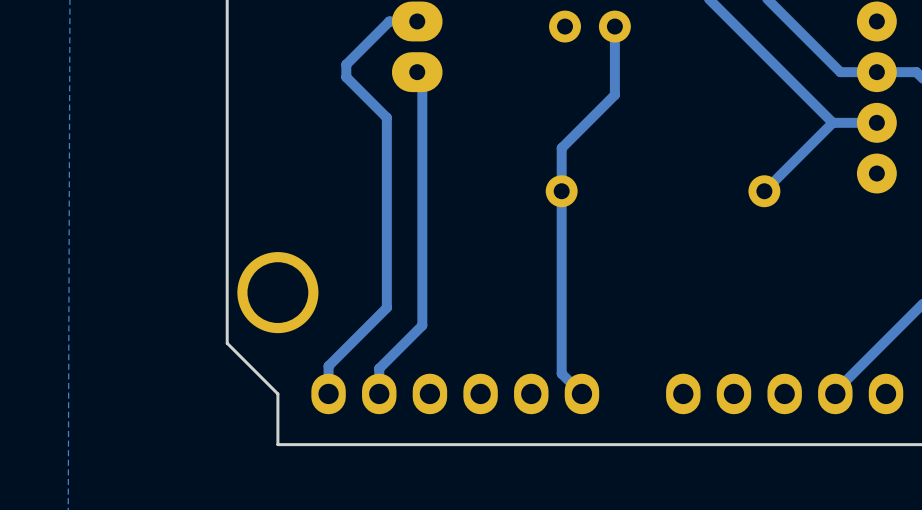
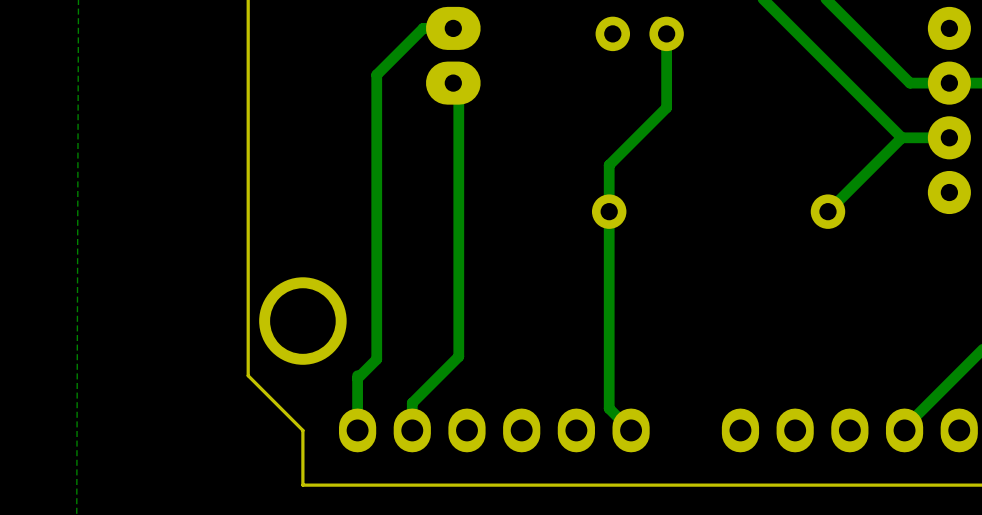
track: (346, 77) (386, 117) (386, 307) (328, 366) -> (376, 88) (376, 359) (357, 378)
track: none -> (357, 375) (357, 400)

